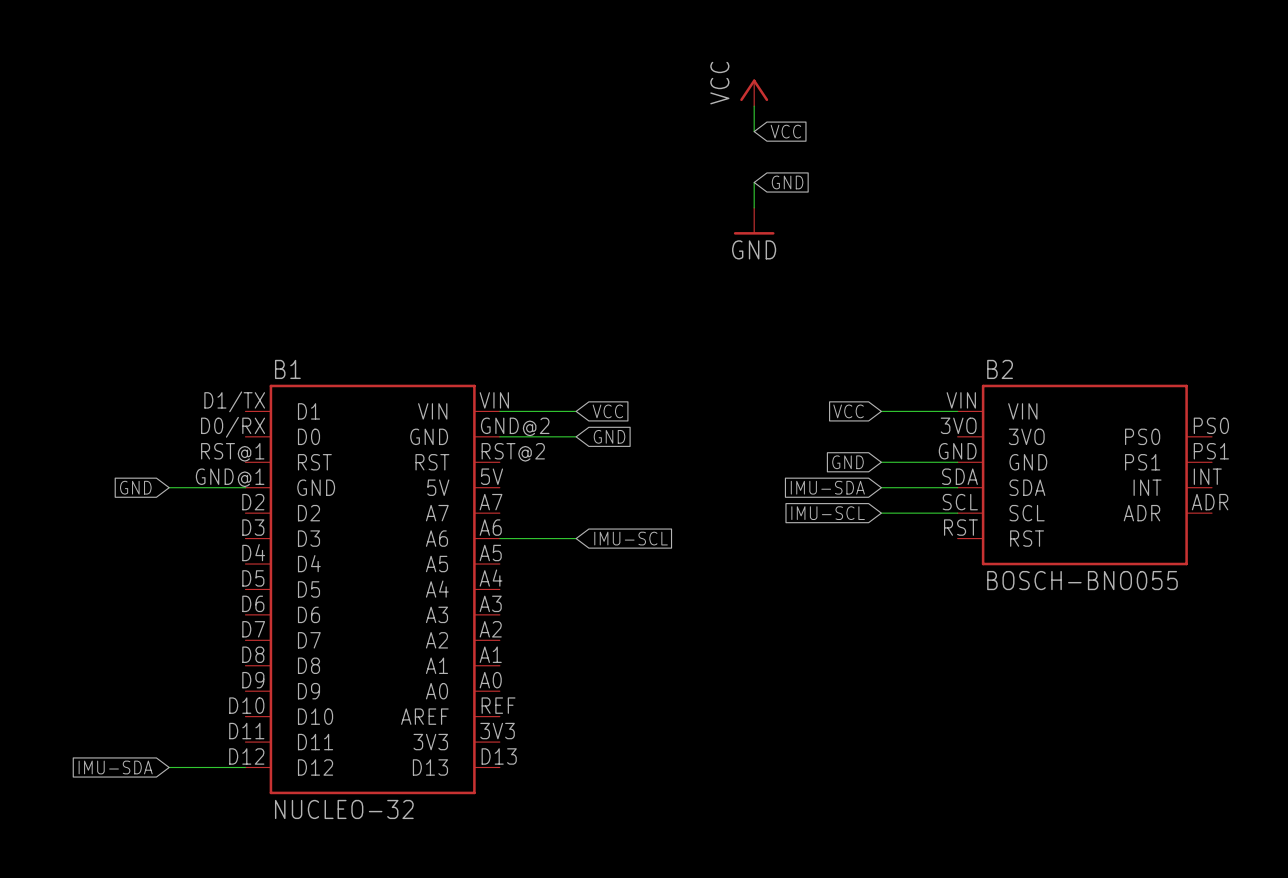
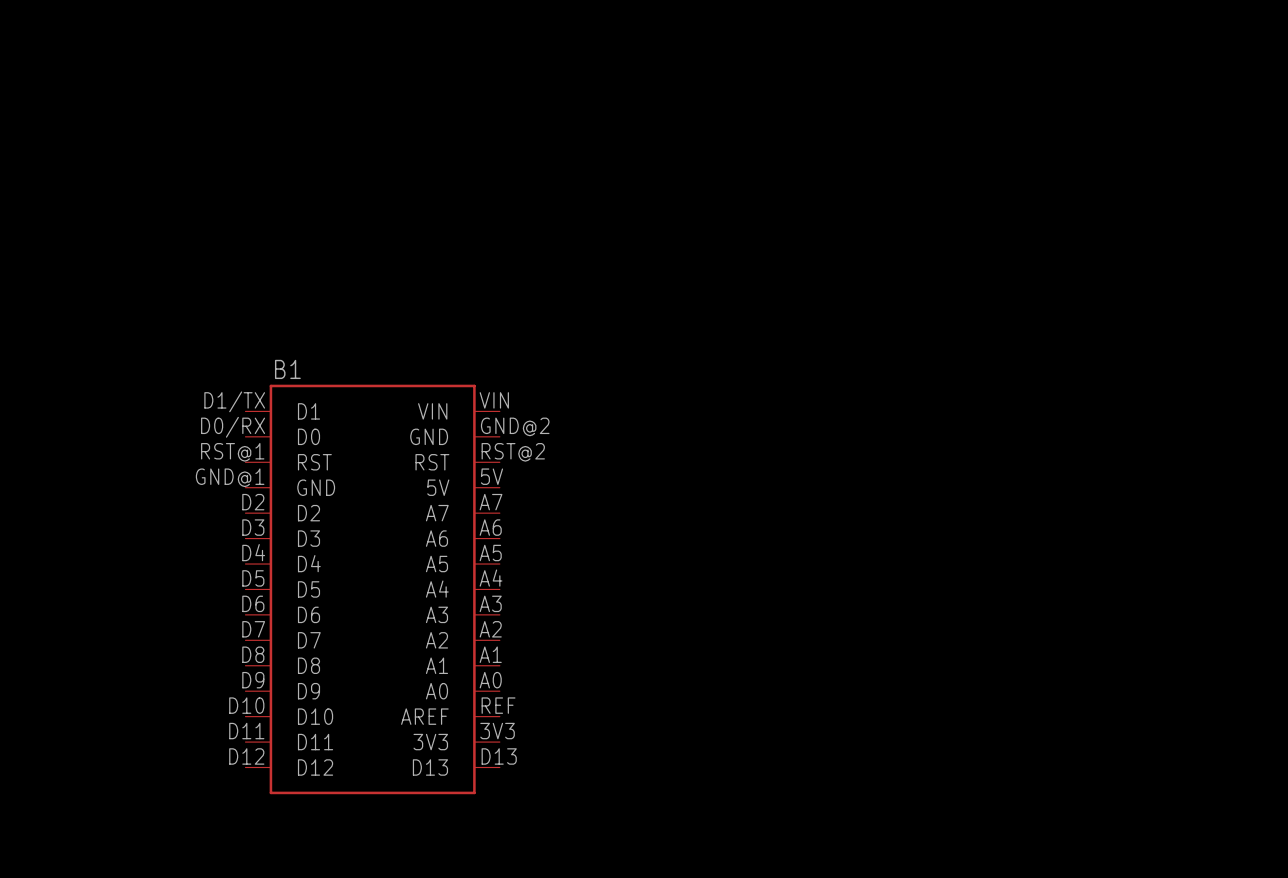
power symbol: VCC (754, 92) -> none
wire: (754, 106) (754, 131) -> none
global label: VCC (785, 131) -> none
wire: (754, 182) (754, 207) -> none
global label: GND (787, 182) -> none
power symbol: GND (754, 221) -> none
wire: (499, 411) (576, 411) -> none
global label: VCC (607, 411) -> none
global label: VCC (848, 411) -> none
wire: (881, 411) (957, 411) -> none
wire: (499, 436) (576, 436) -> none
global label: GND (609, 436) -> none
global label: GND (847, 462) -> none
wire: (881, 462) (957, 462) -> none
B2: BOSCH-BNO055 (1084, 474) -> none
global label: GND (135, 487) -> none
wire: (169, 487) (245, 487) -> none
global label: IMU-SDA (827, 487) -> none
wire: (881, 487) (957, 487) -> none
global label: IMU-SCL (828, 513) -> none
wire: (881, 513) (957, 513) -> none
wire: (499, 538) (576, 538) -> none
global label: IMU-SCL (631, 538) -> none
global label: IMU-SDA (115, 767) -> none
wire: (169, 767) (245, 767) -> none
B1 value: NUCLEO-32 (344, 809) -> none

